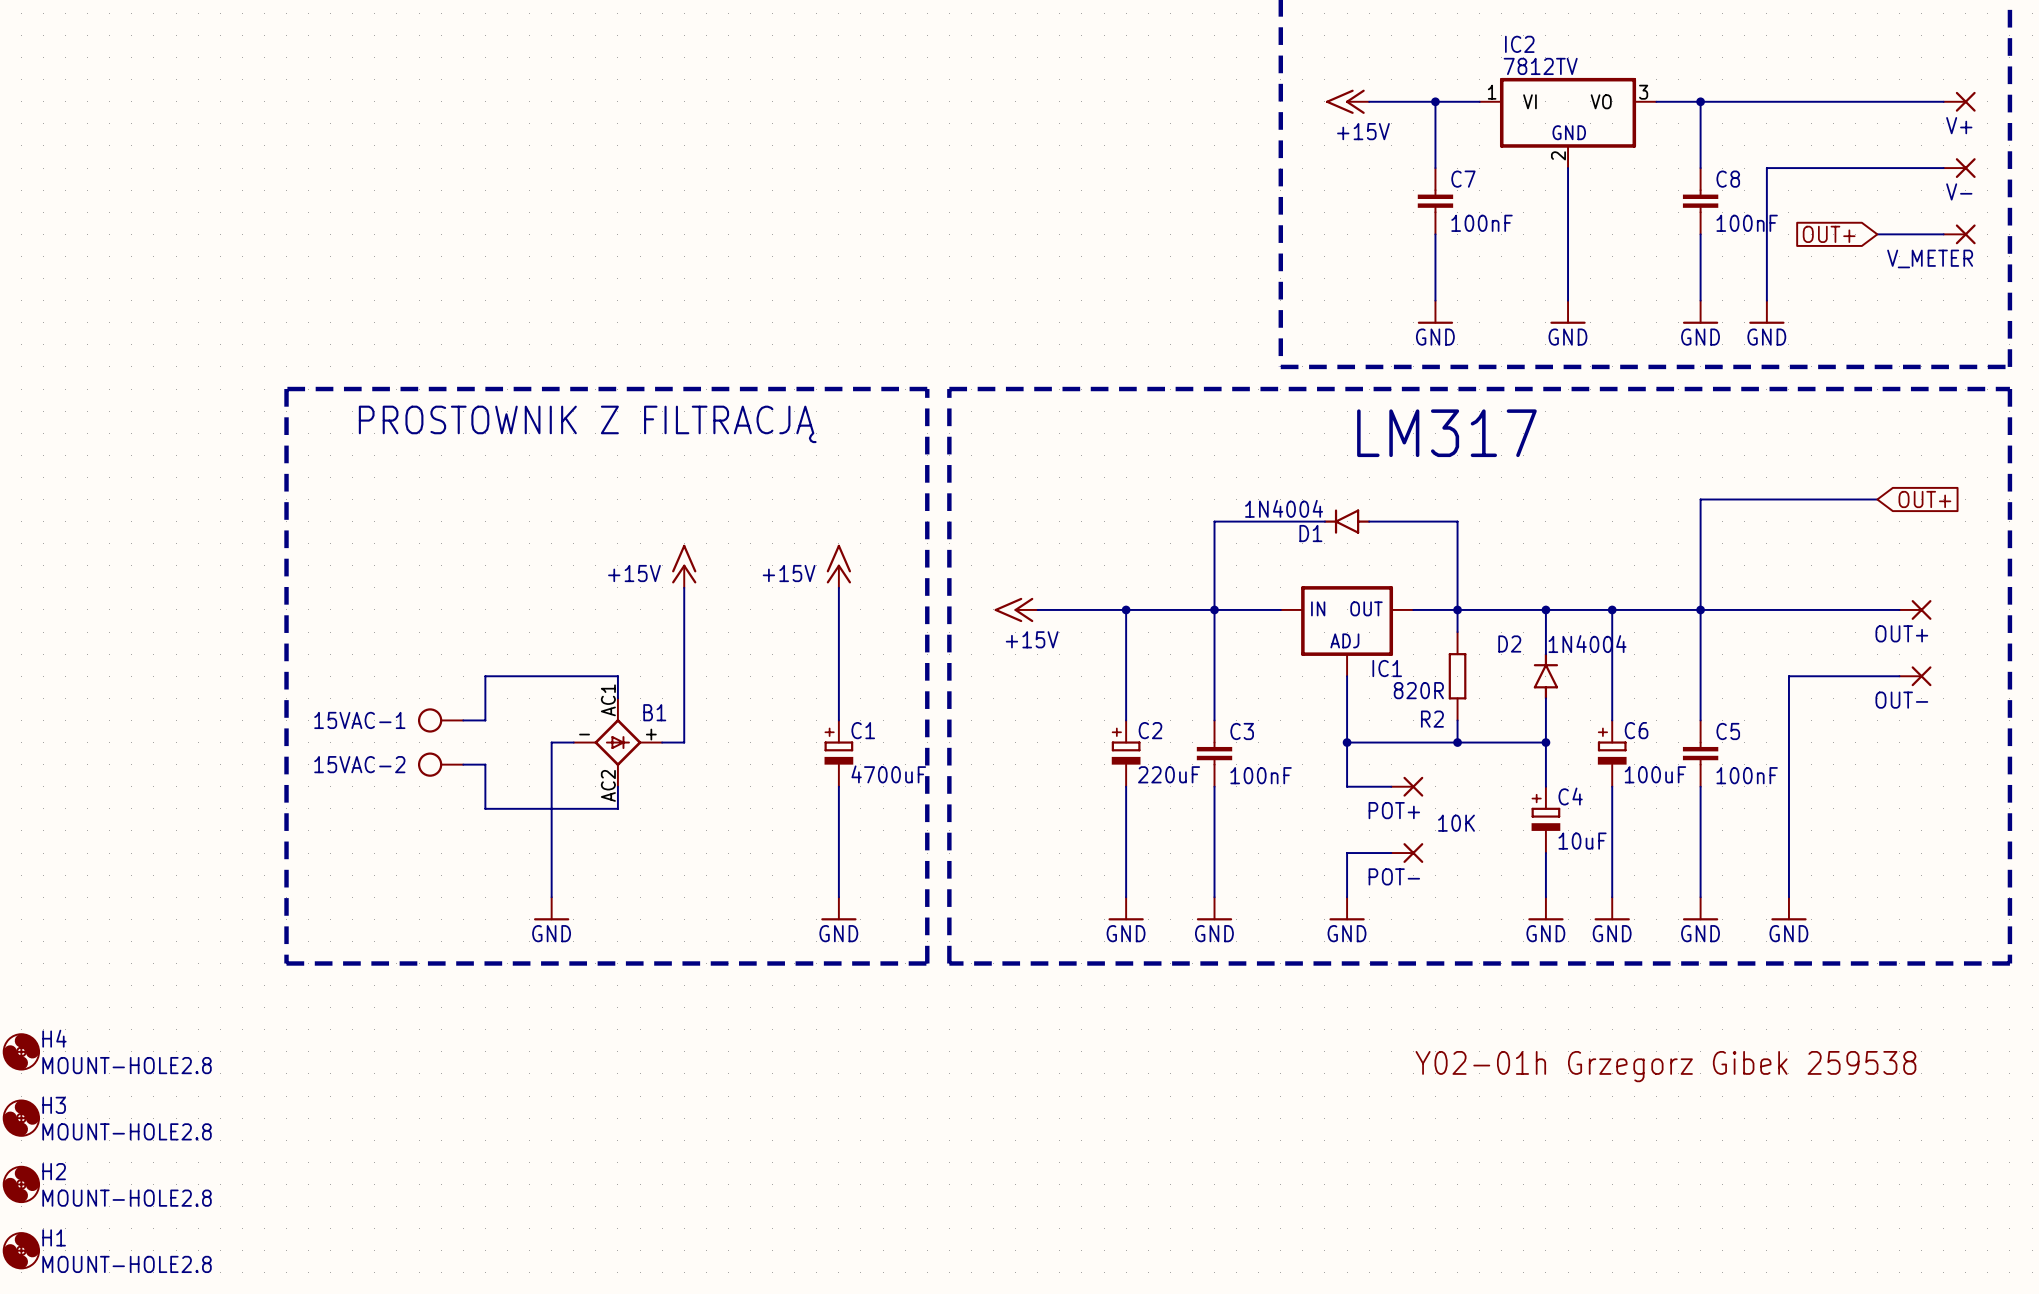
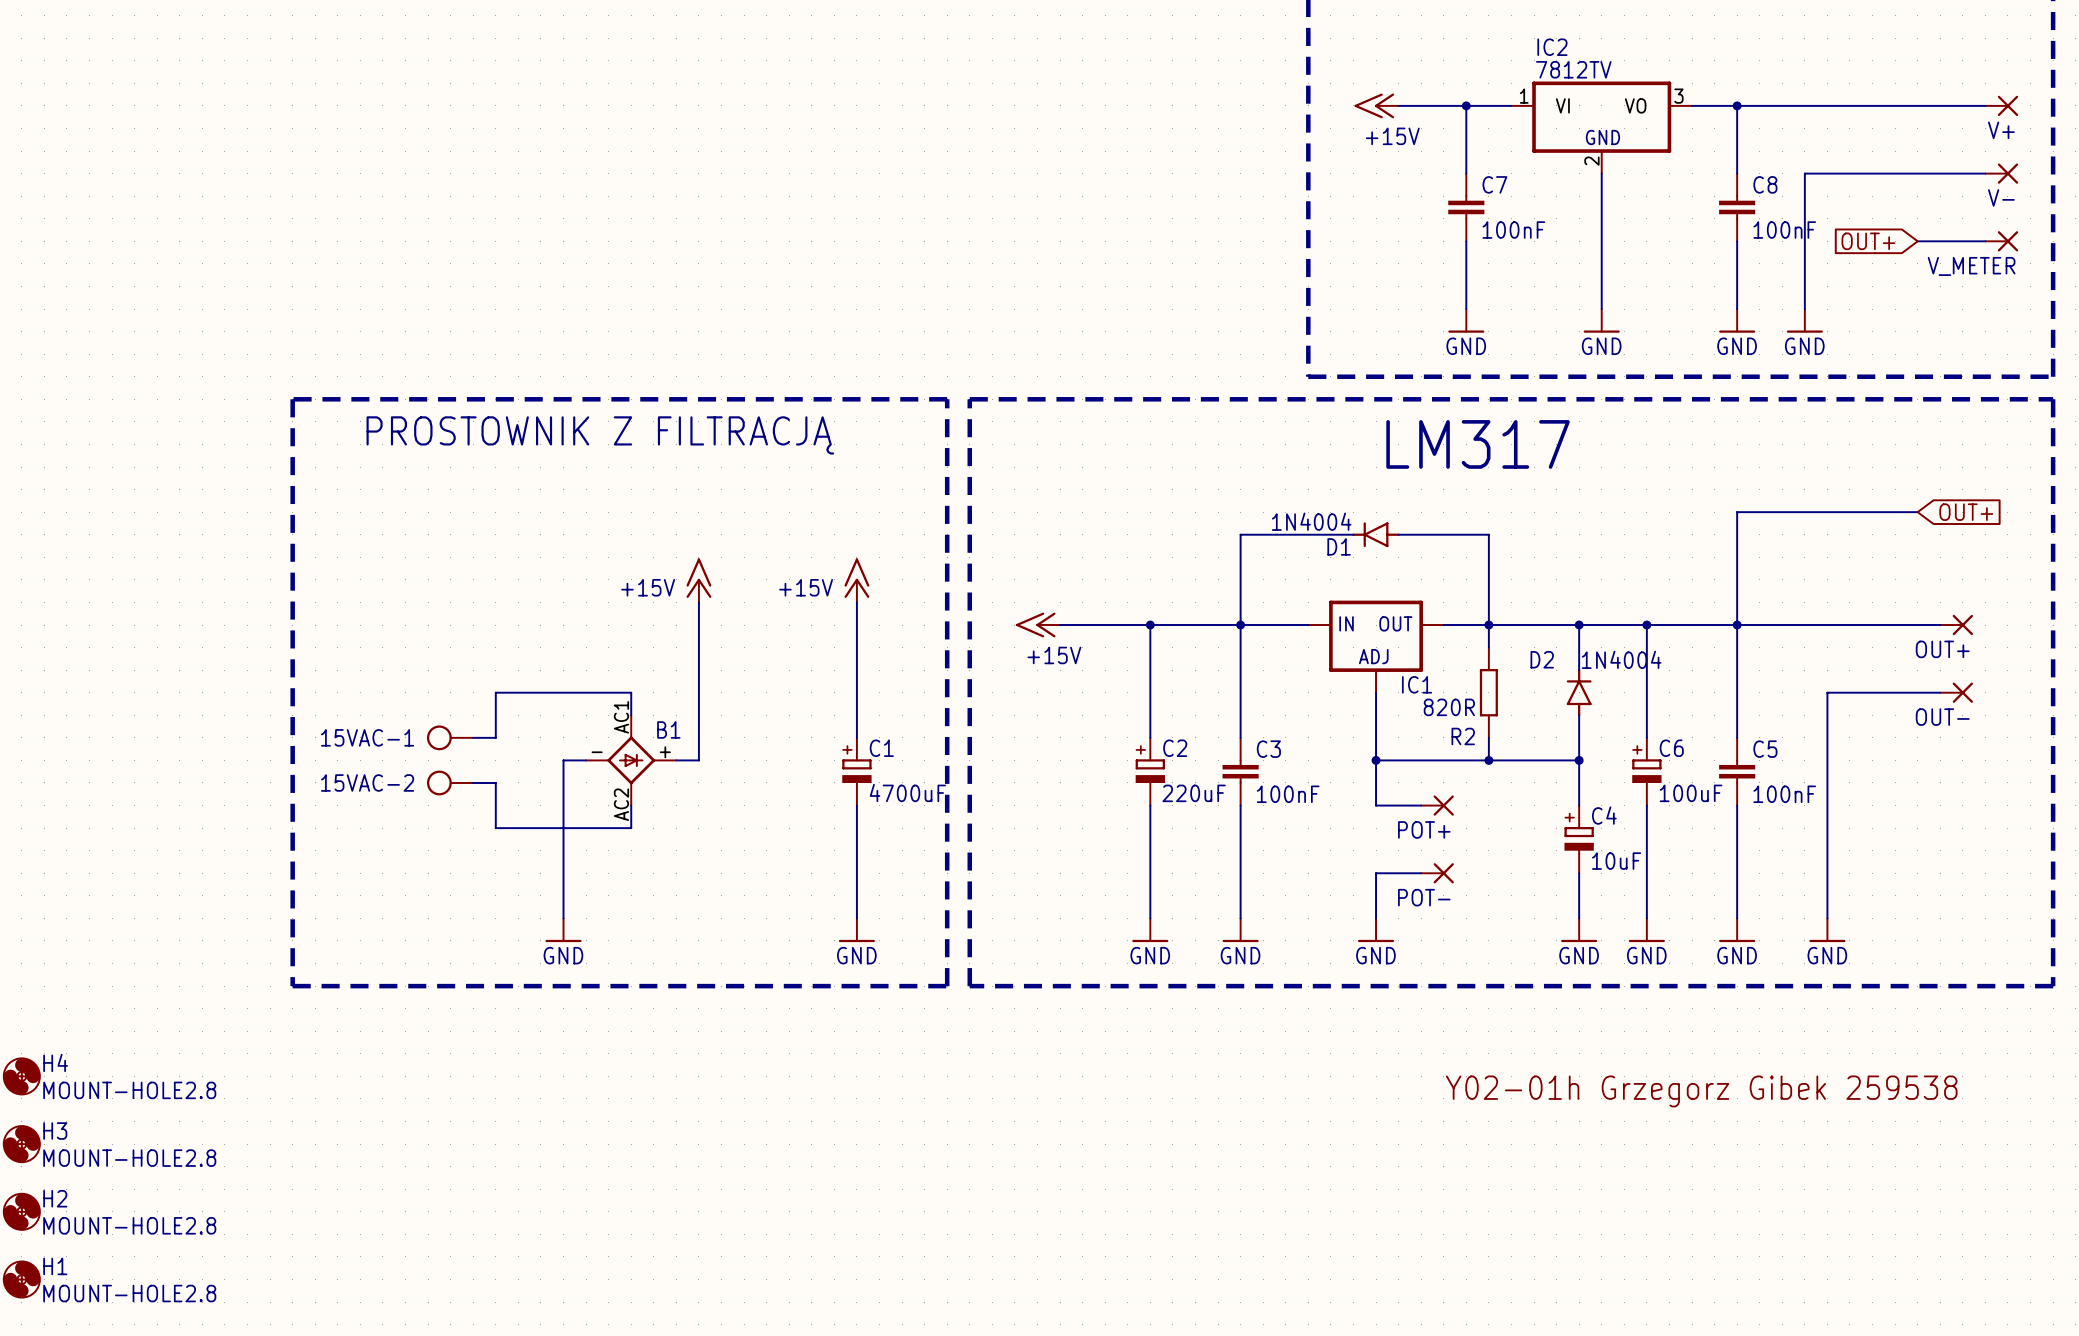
text: 10K (1456, 823) -> none

